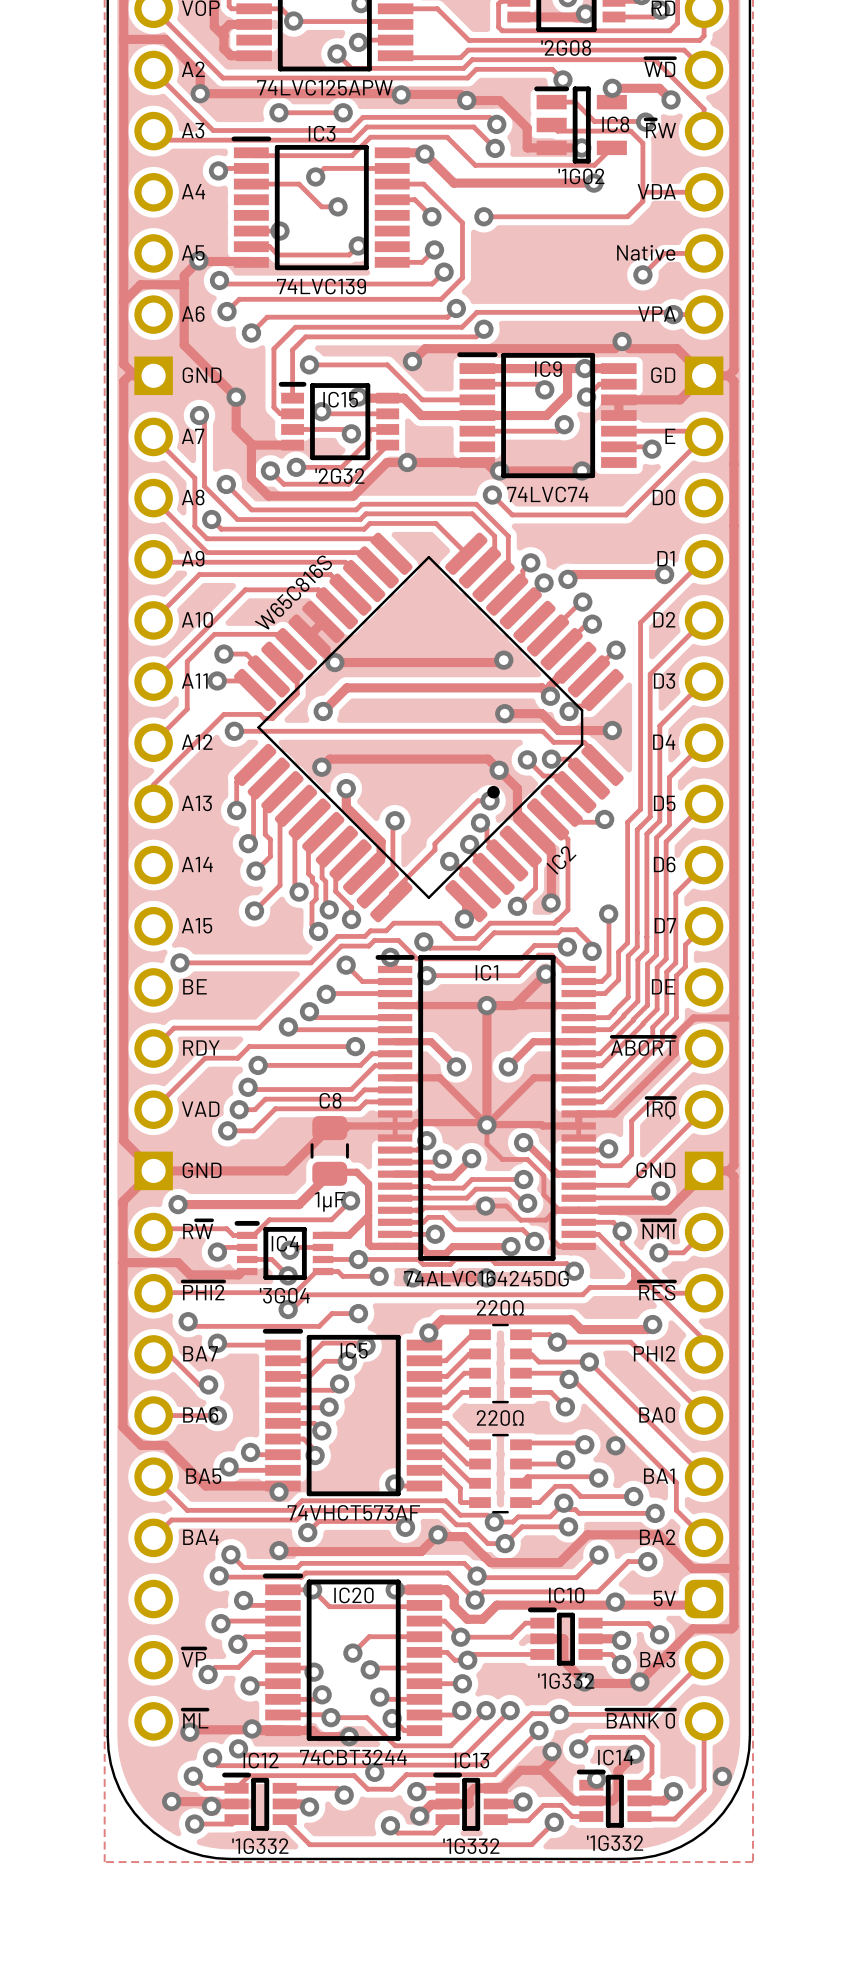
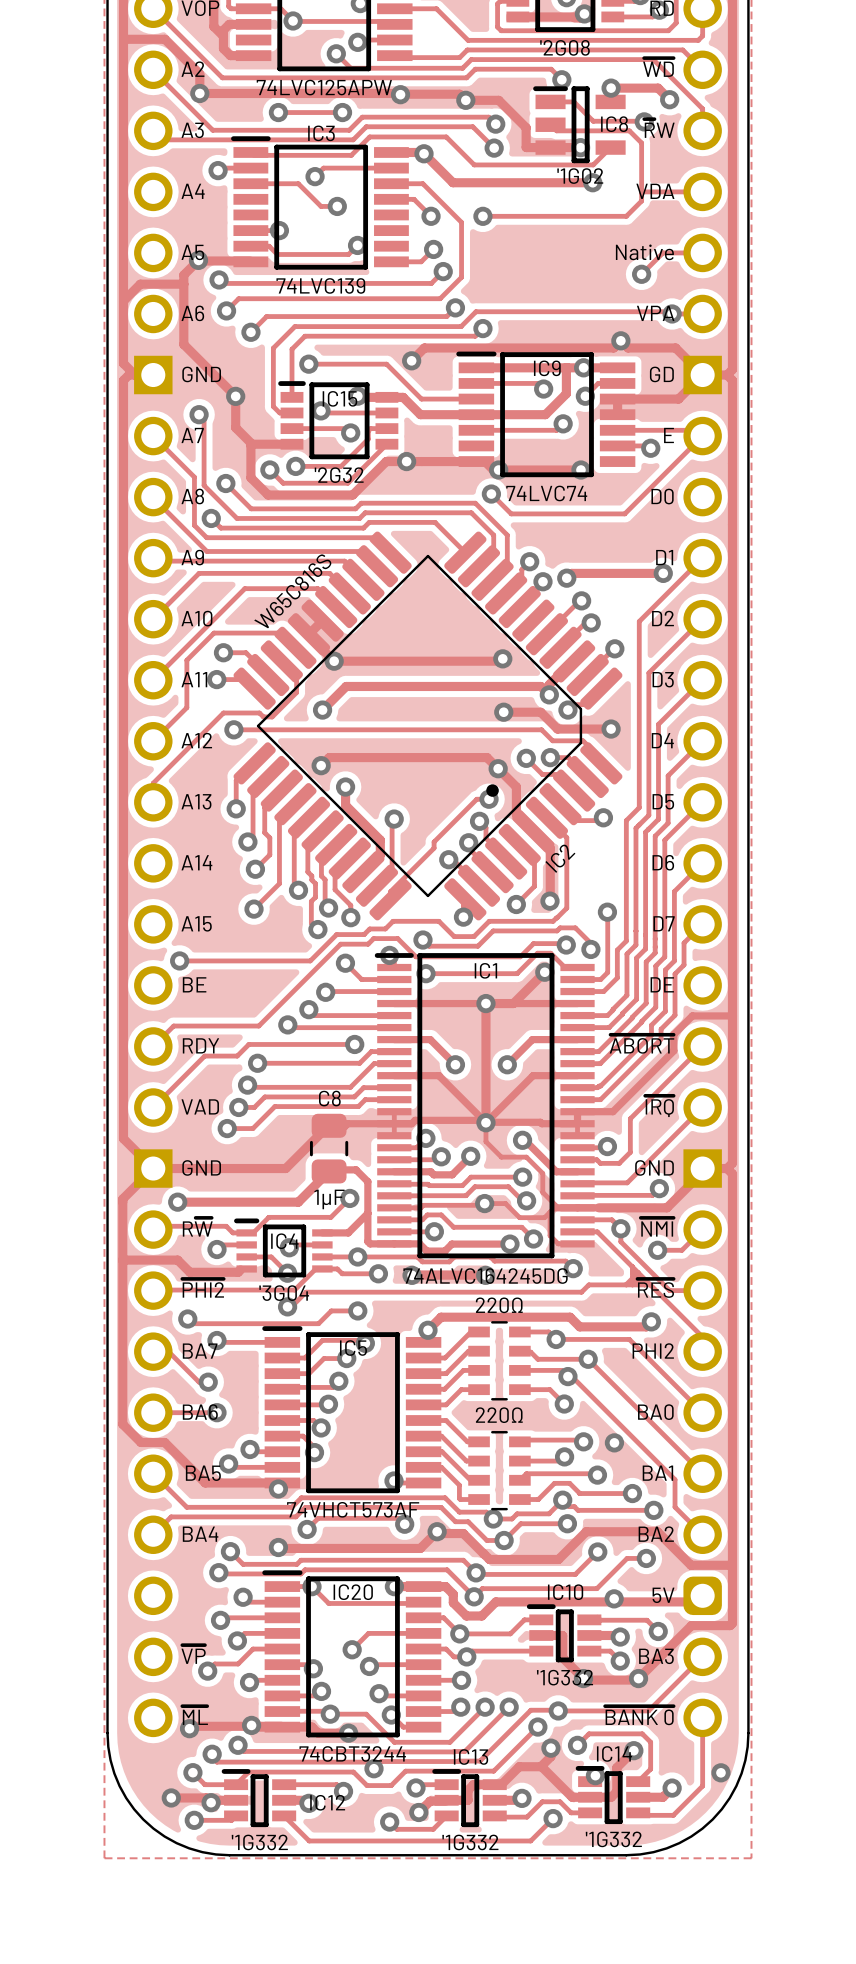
IC12 name position: IC12 (261, 1760) -> IC12 (327, 1802)

